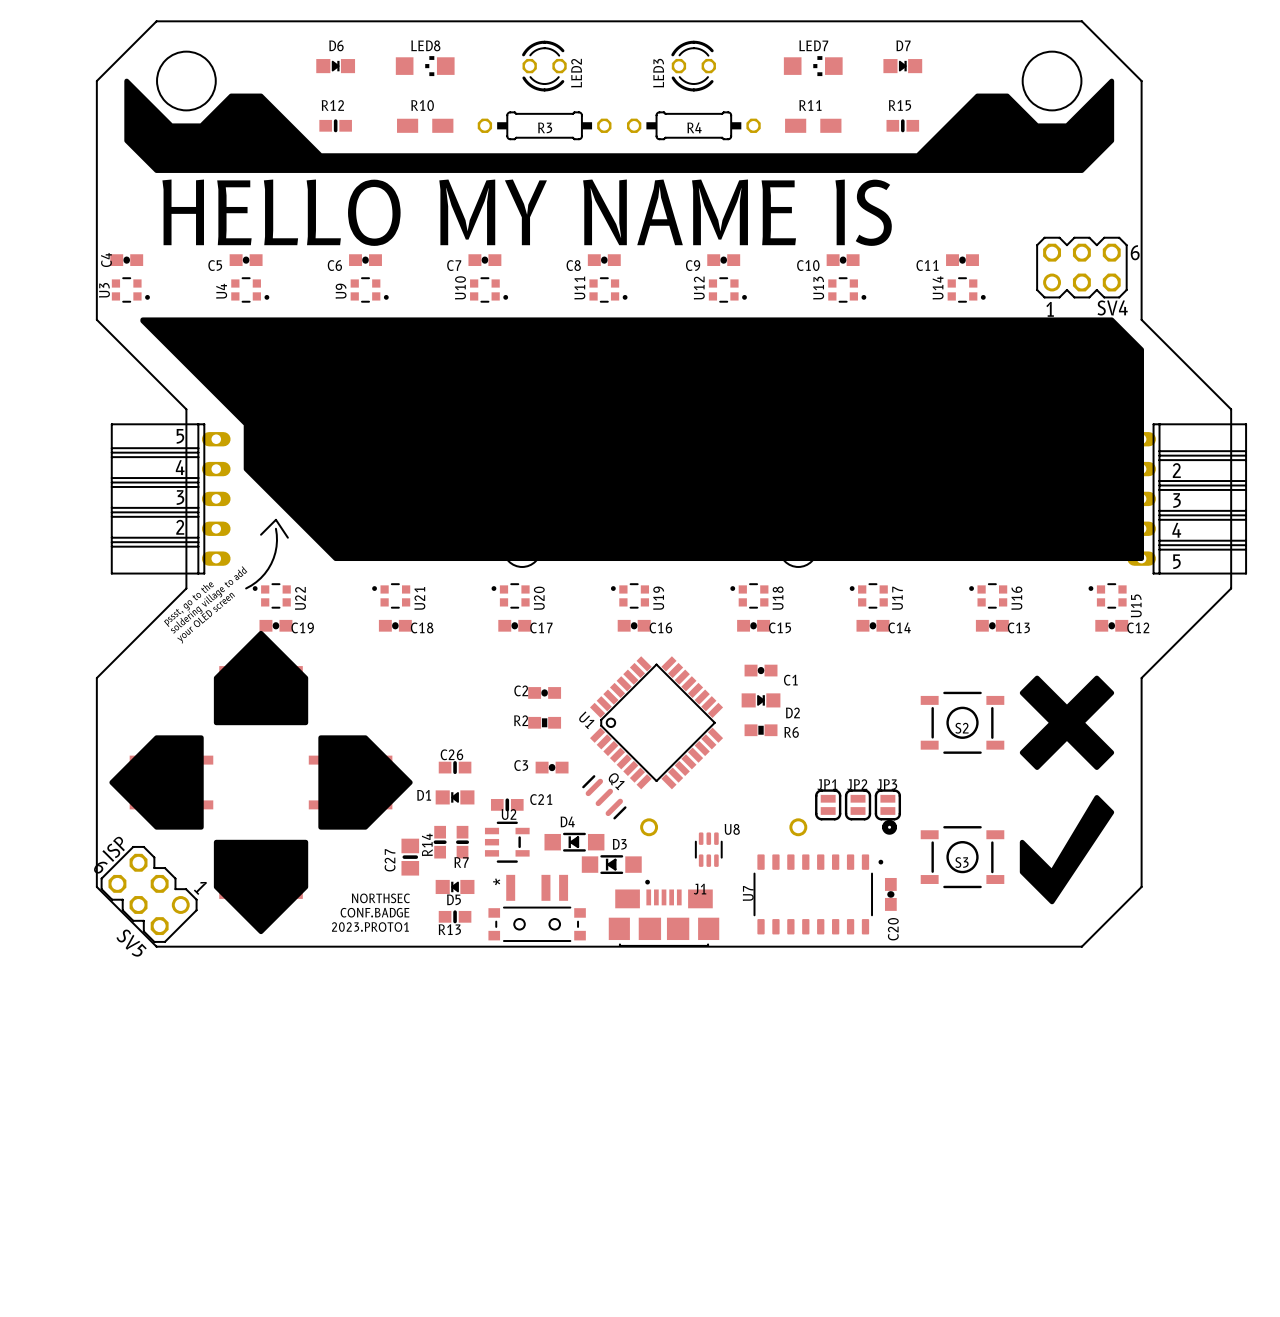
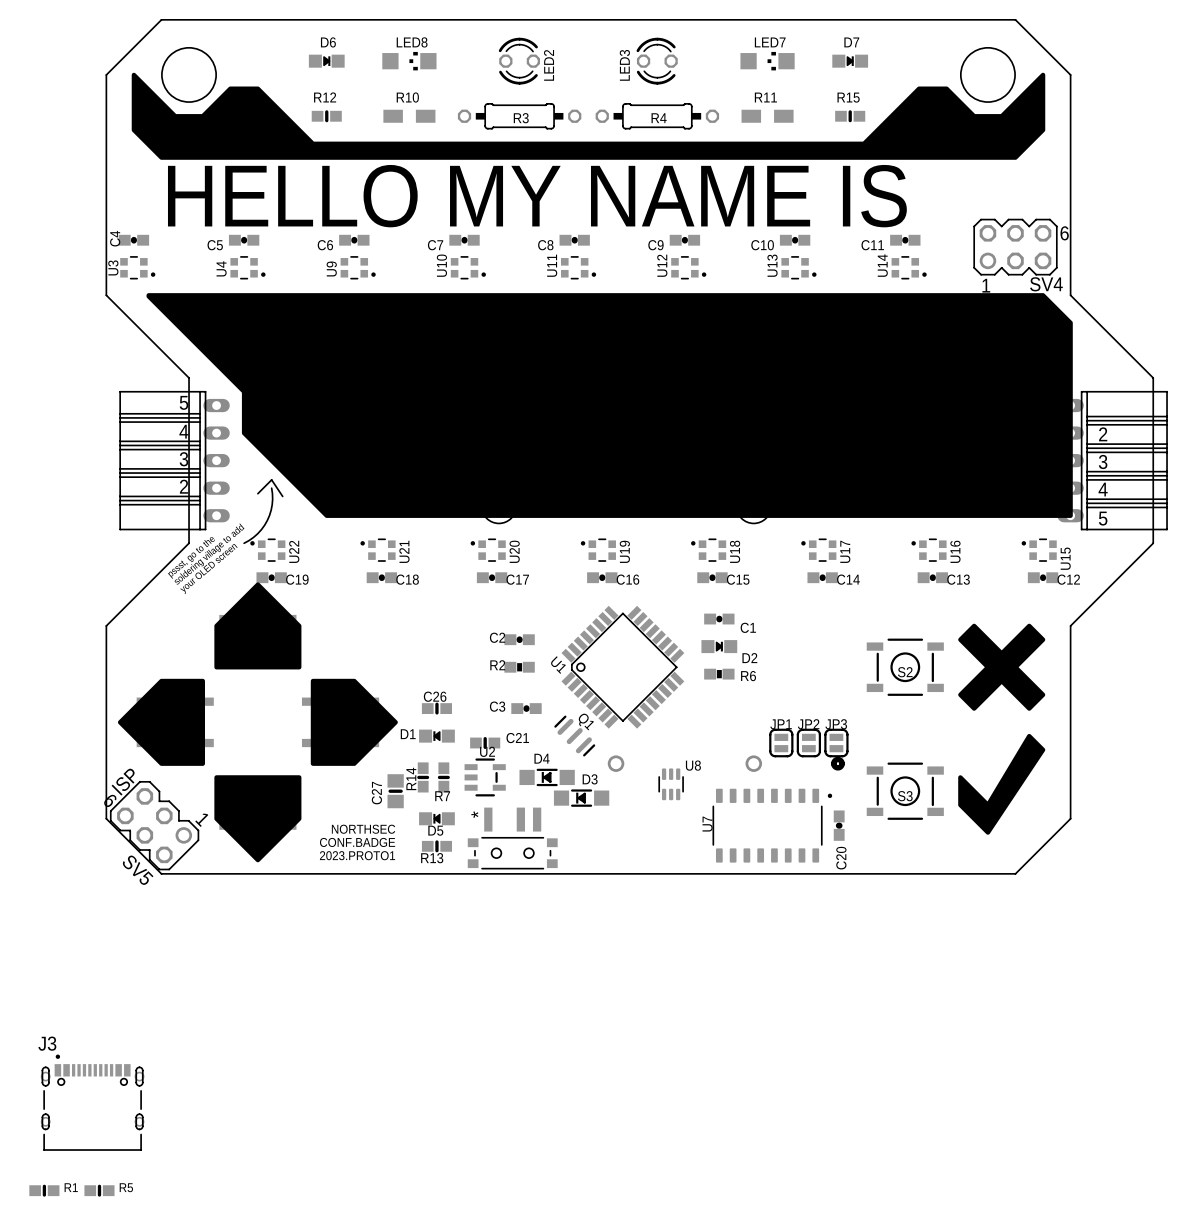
J1: (664, 913) -> none
J3: none -> (92, 1102)
R1: none -> (44, 1190)
R5: none -> (99, 1190)

